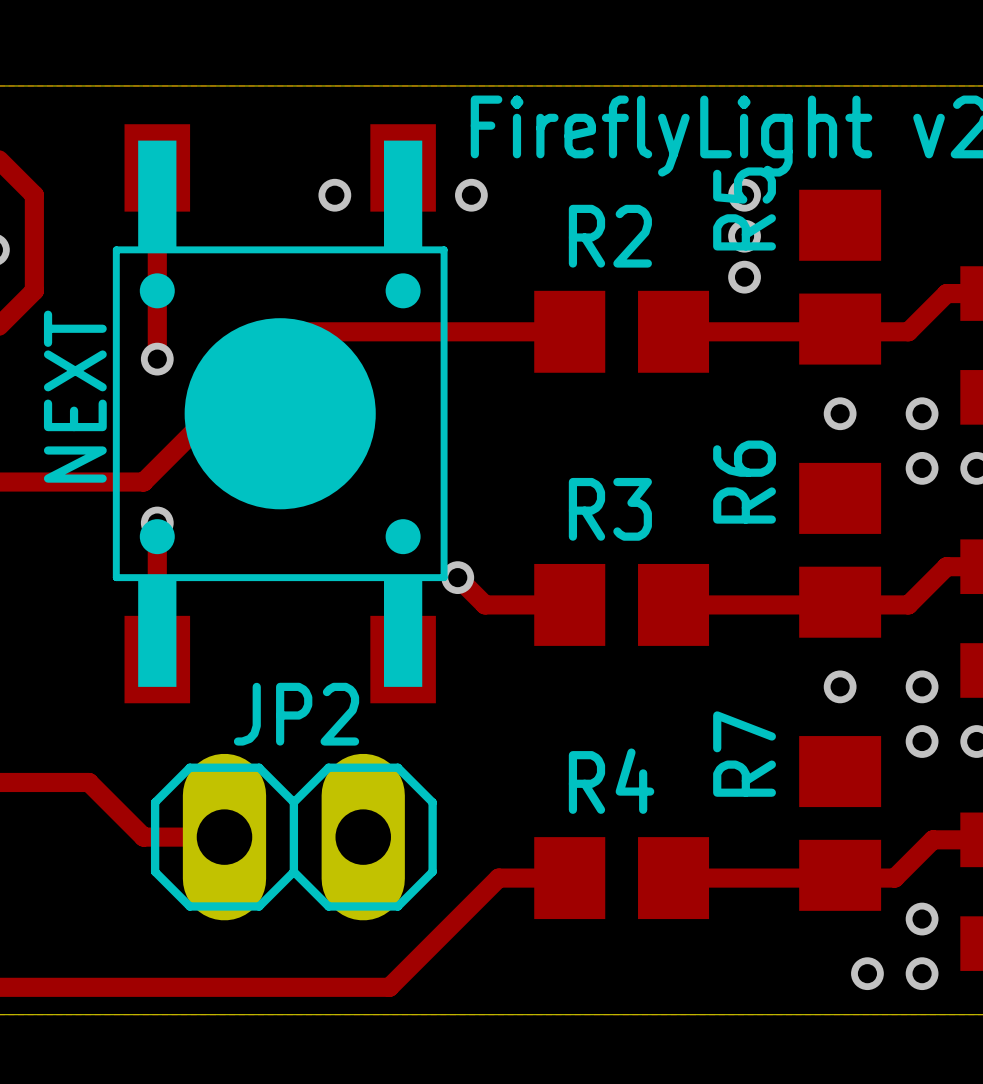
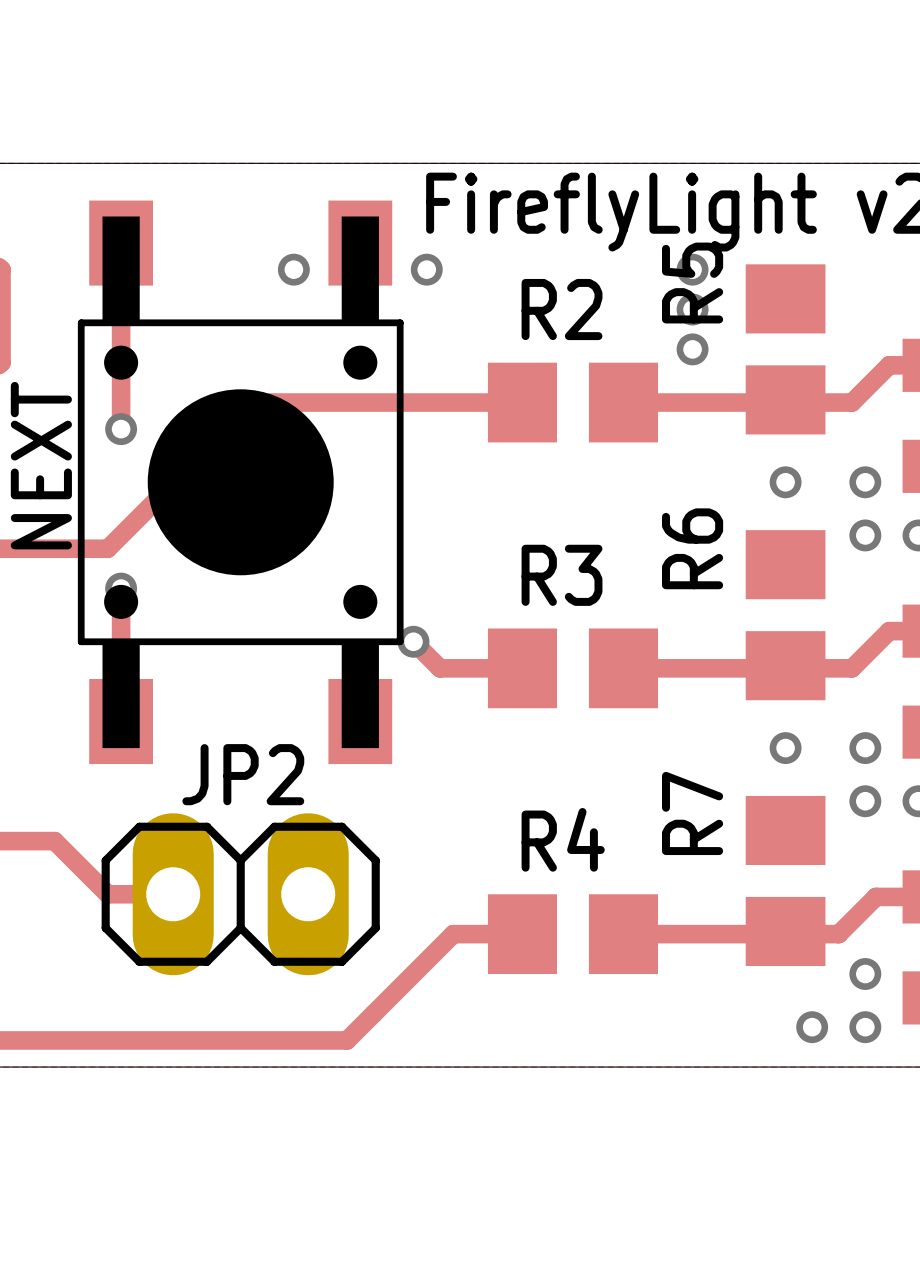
JP2 position: (293, 837) -> (240, 894)

